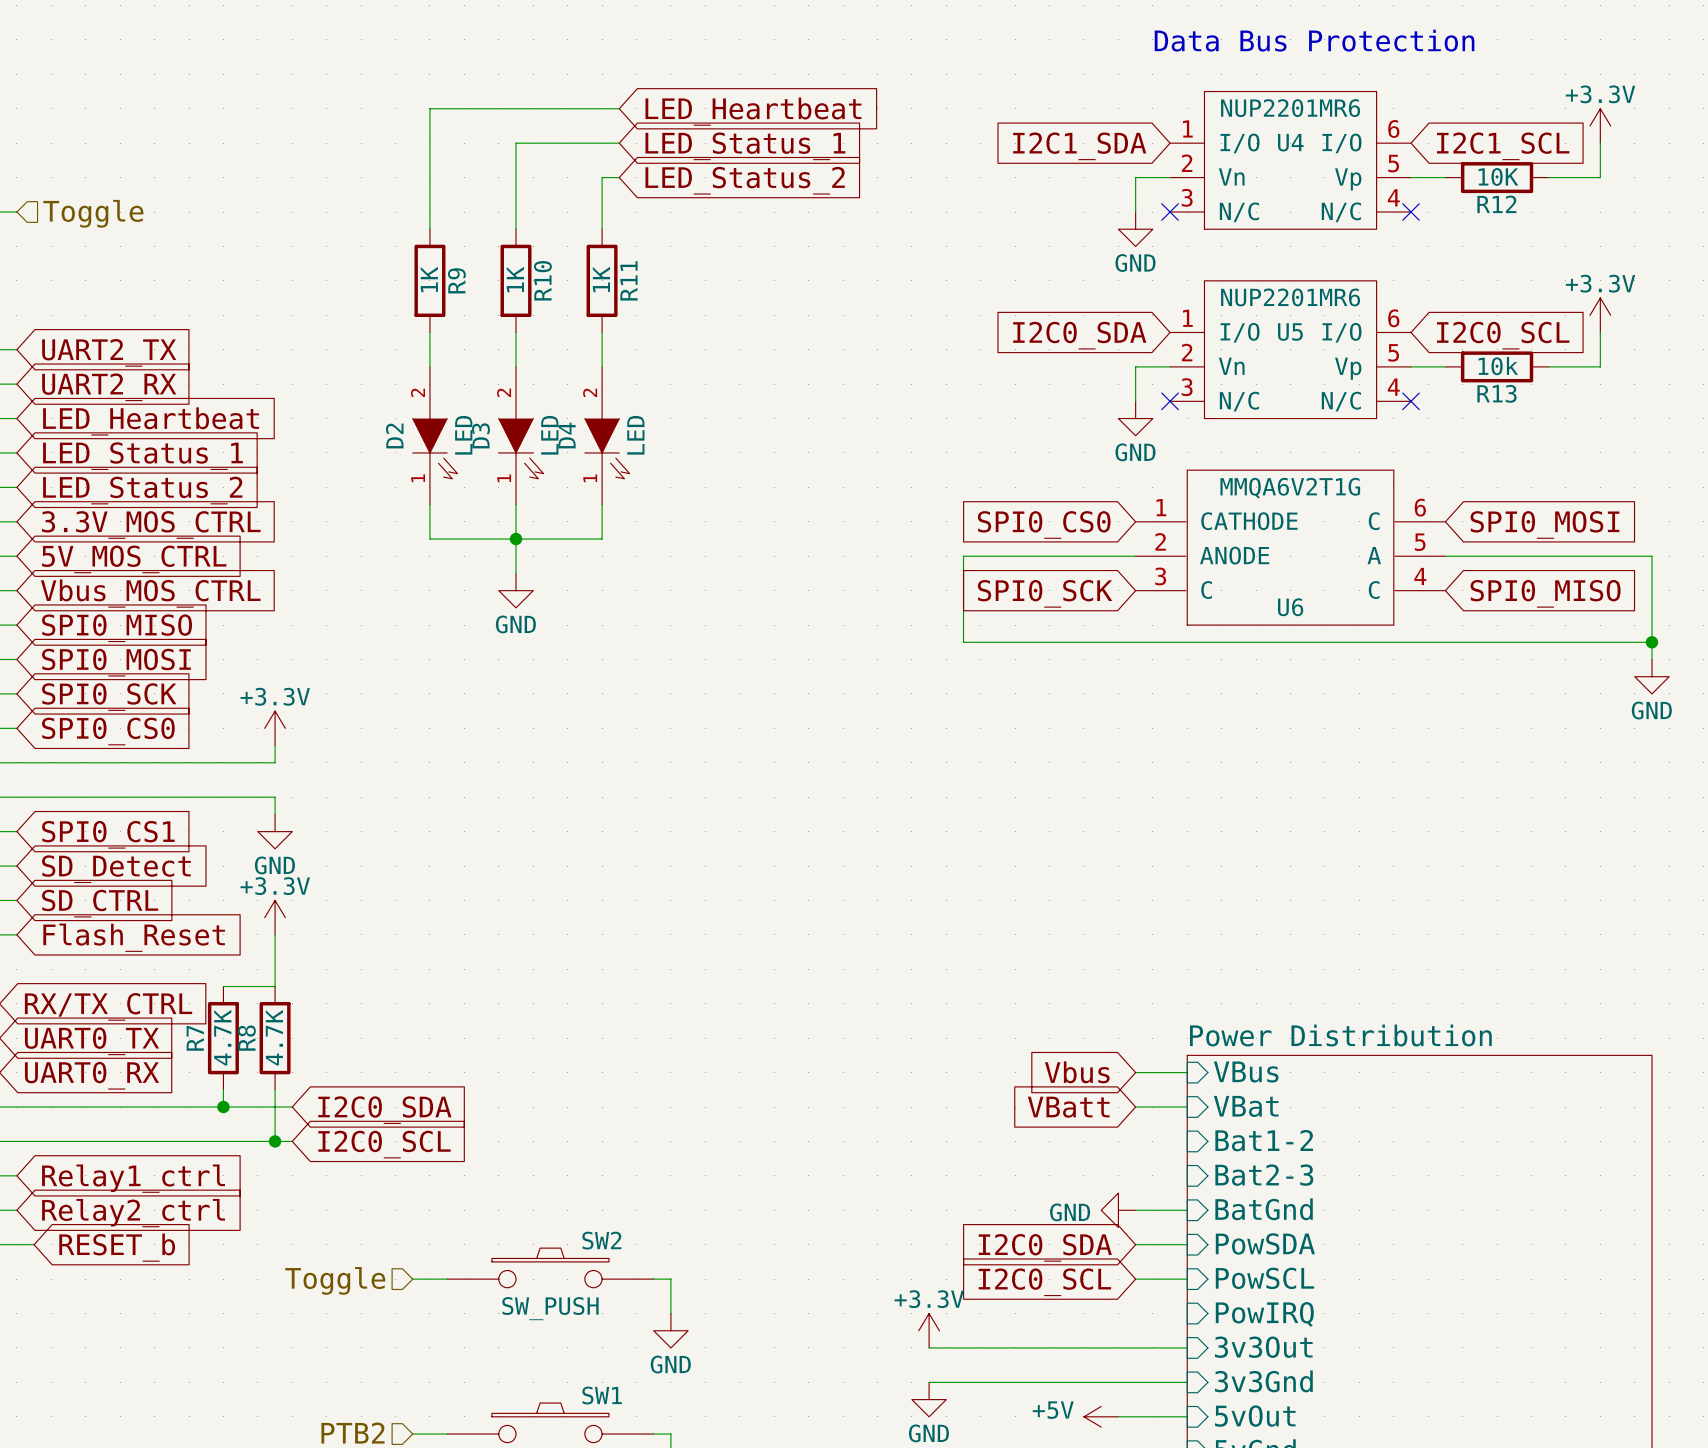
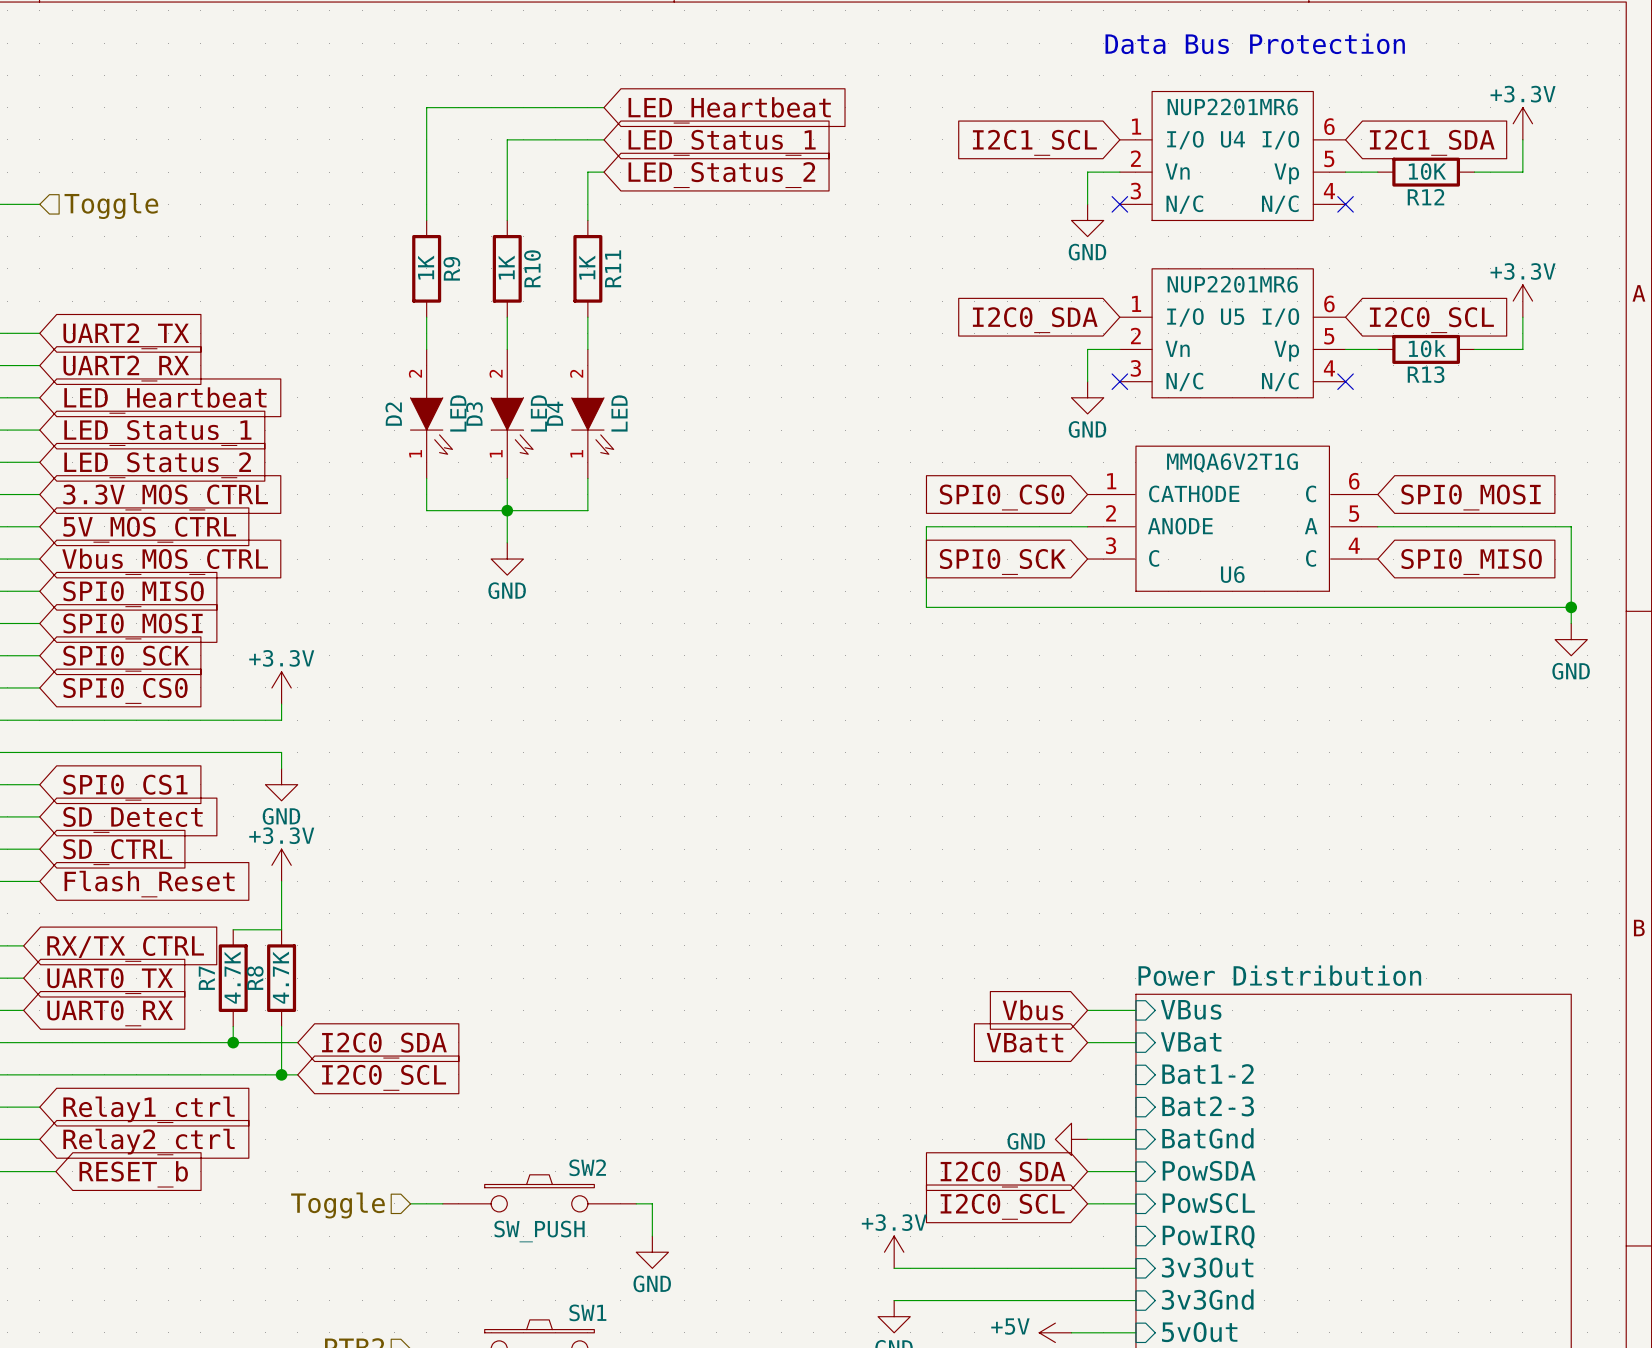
global label: I2C1_SDA (1079, 146) -> I2C1_SCL (1034, 142)
global label: I2C1_SCL (1503, 146) -> I2C1_SDA (1432, 142)

